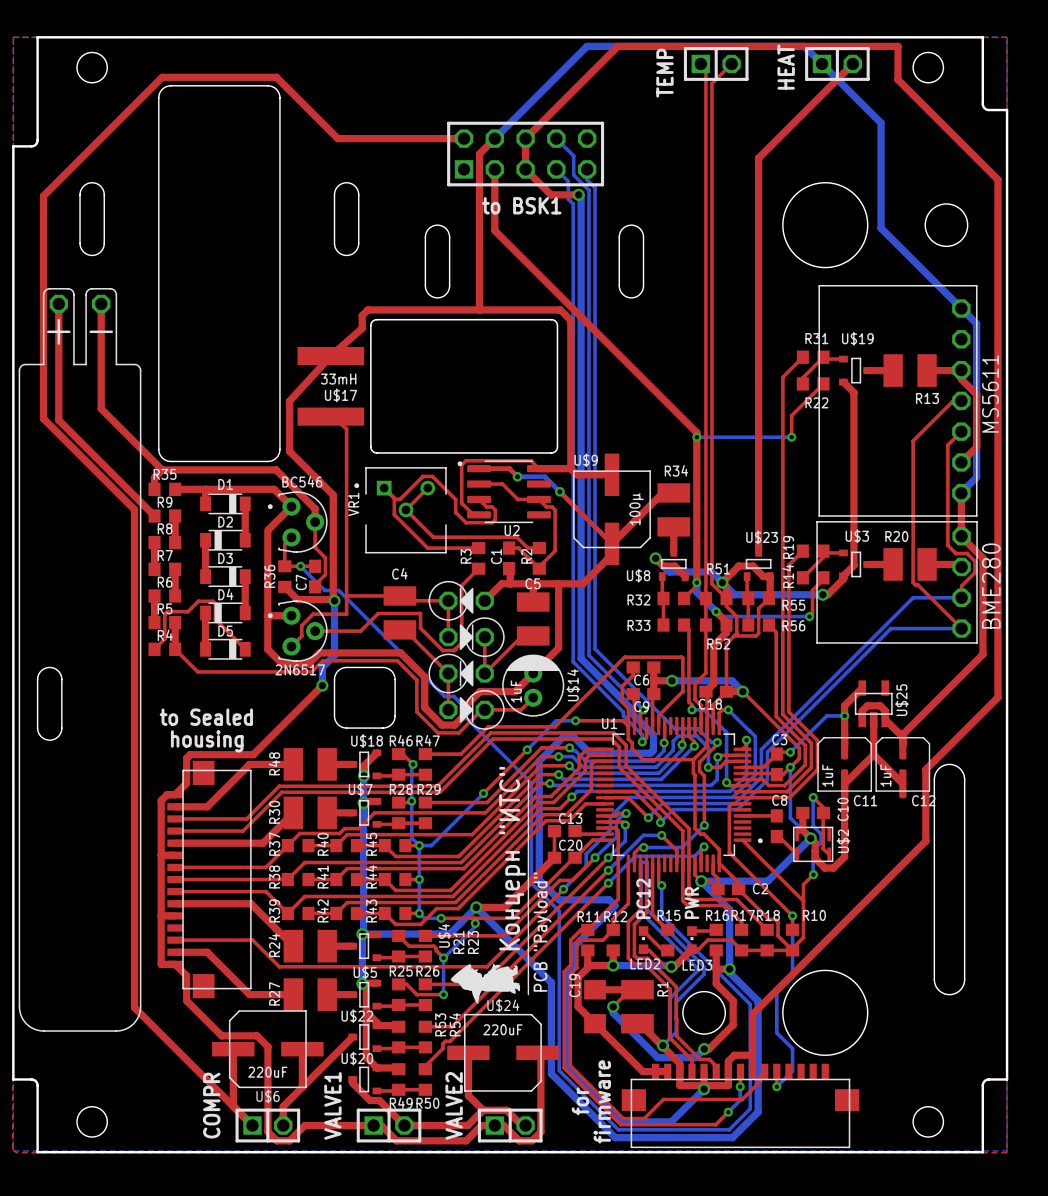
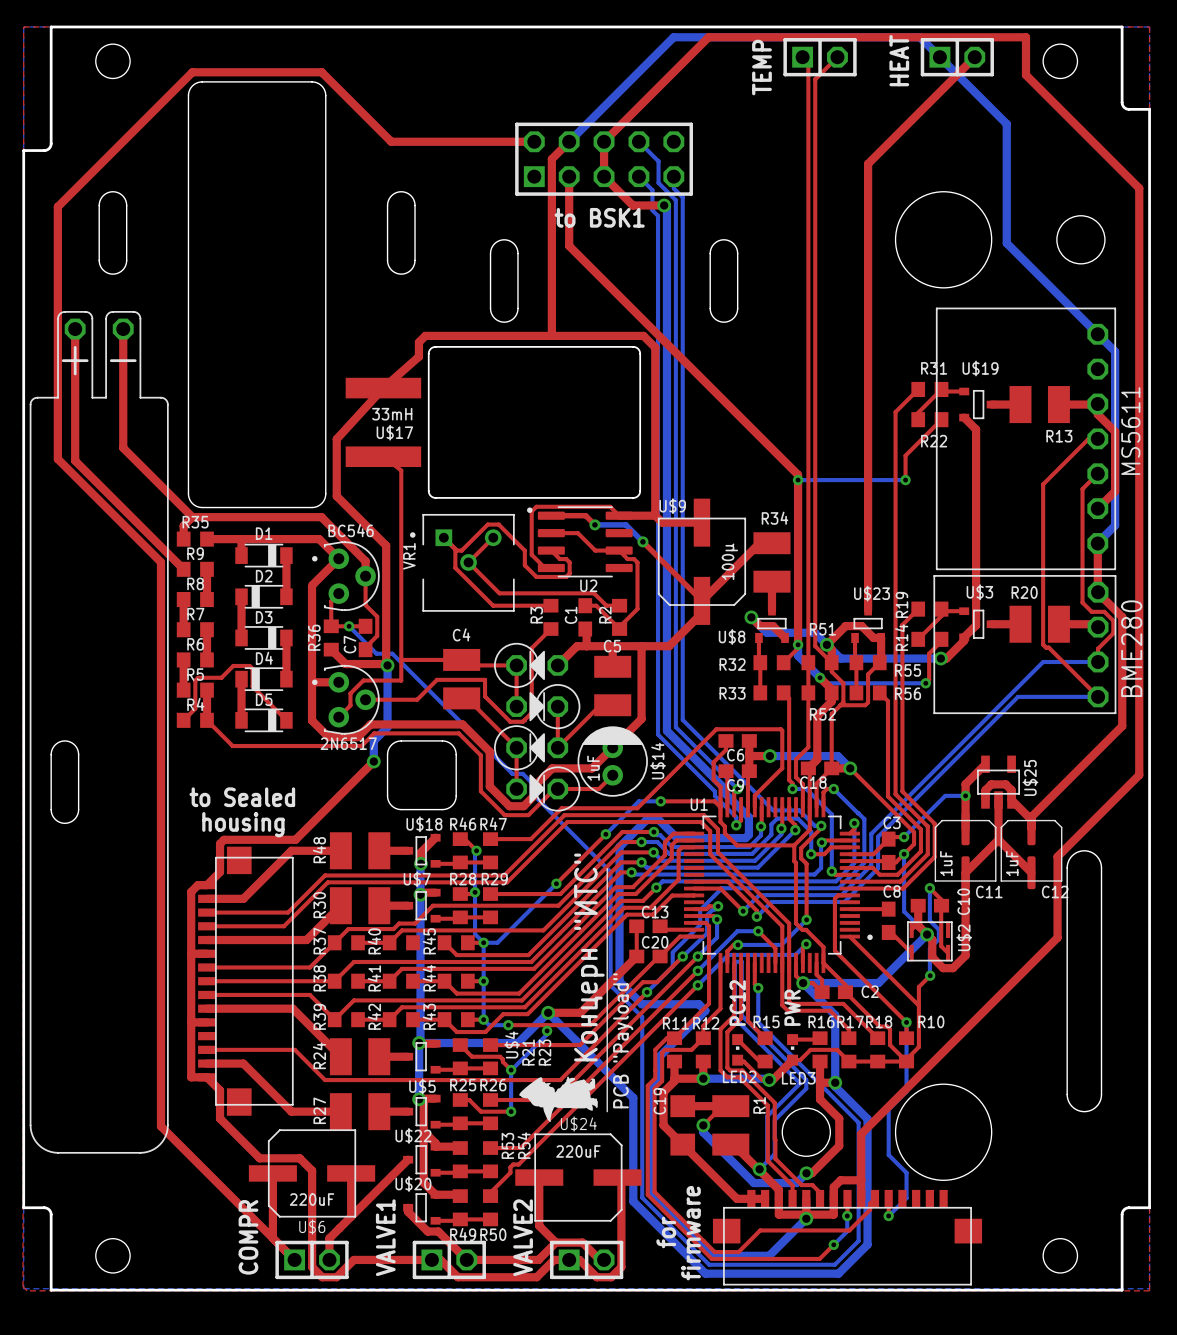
top track: (356, 845) (384, 845) -> none

